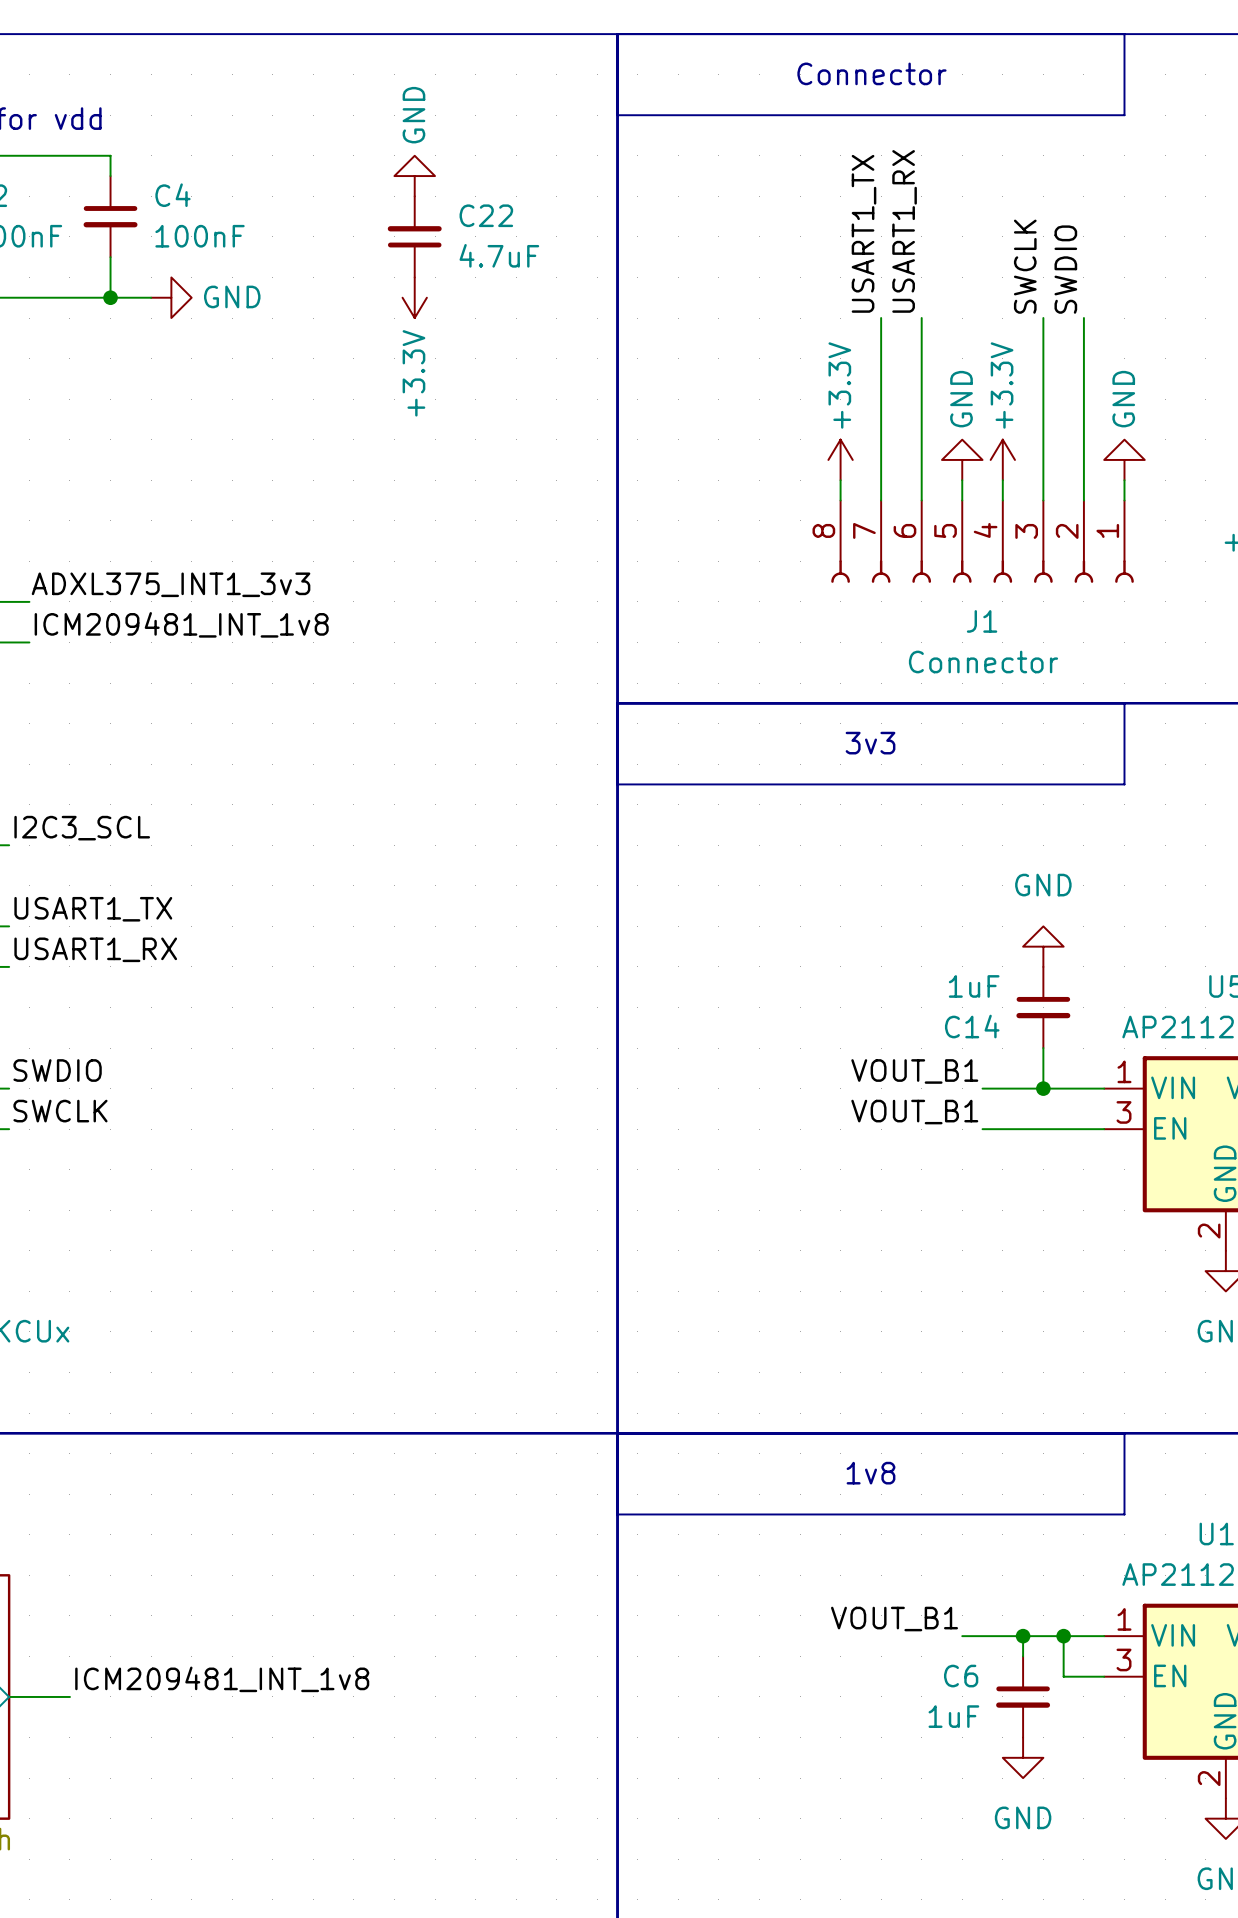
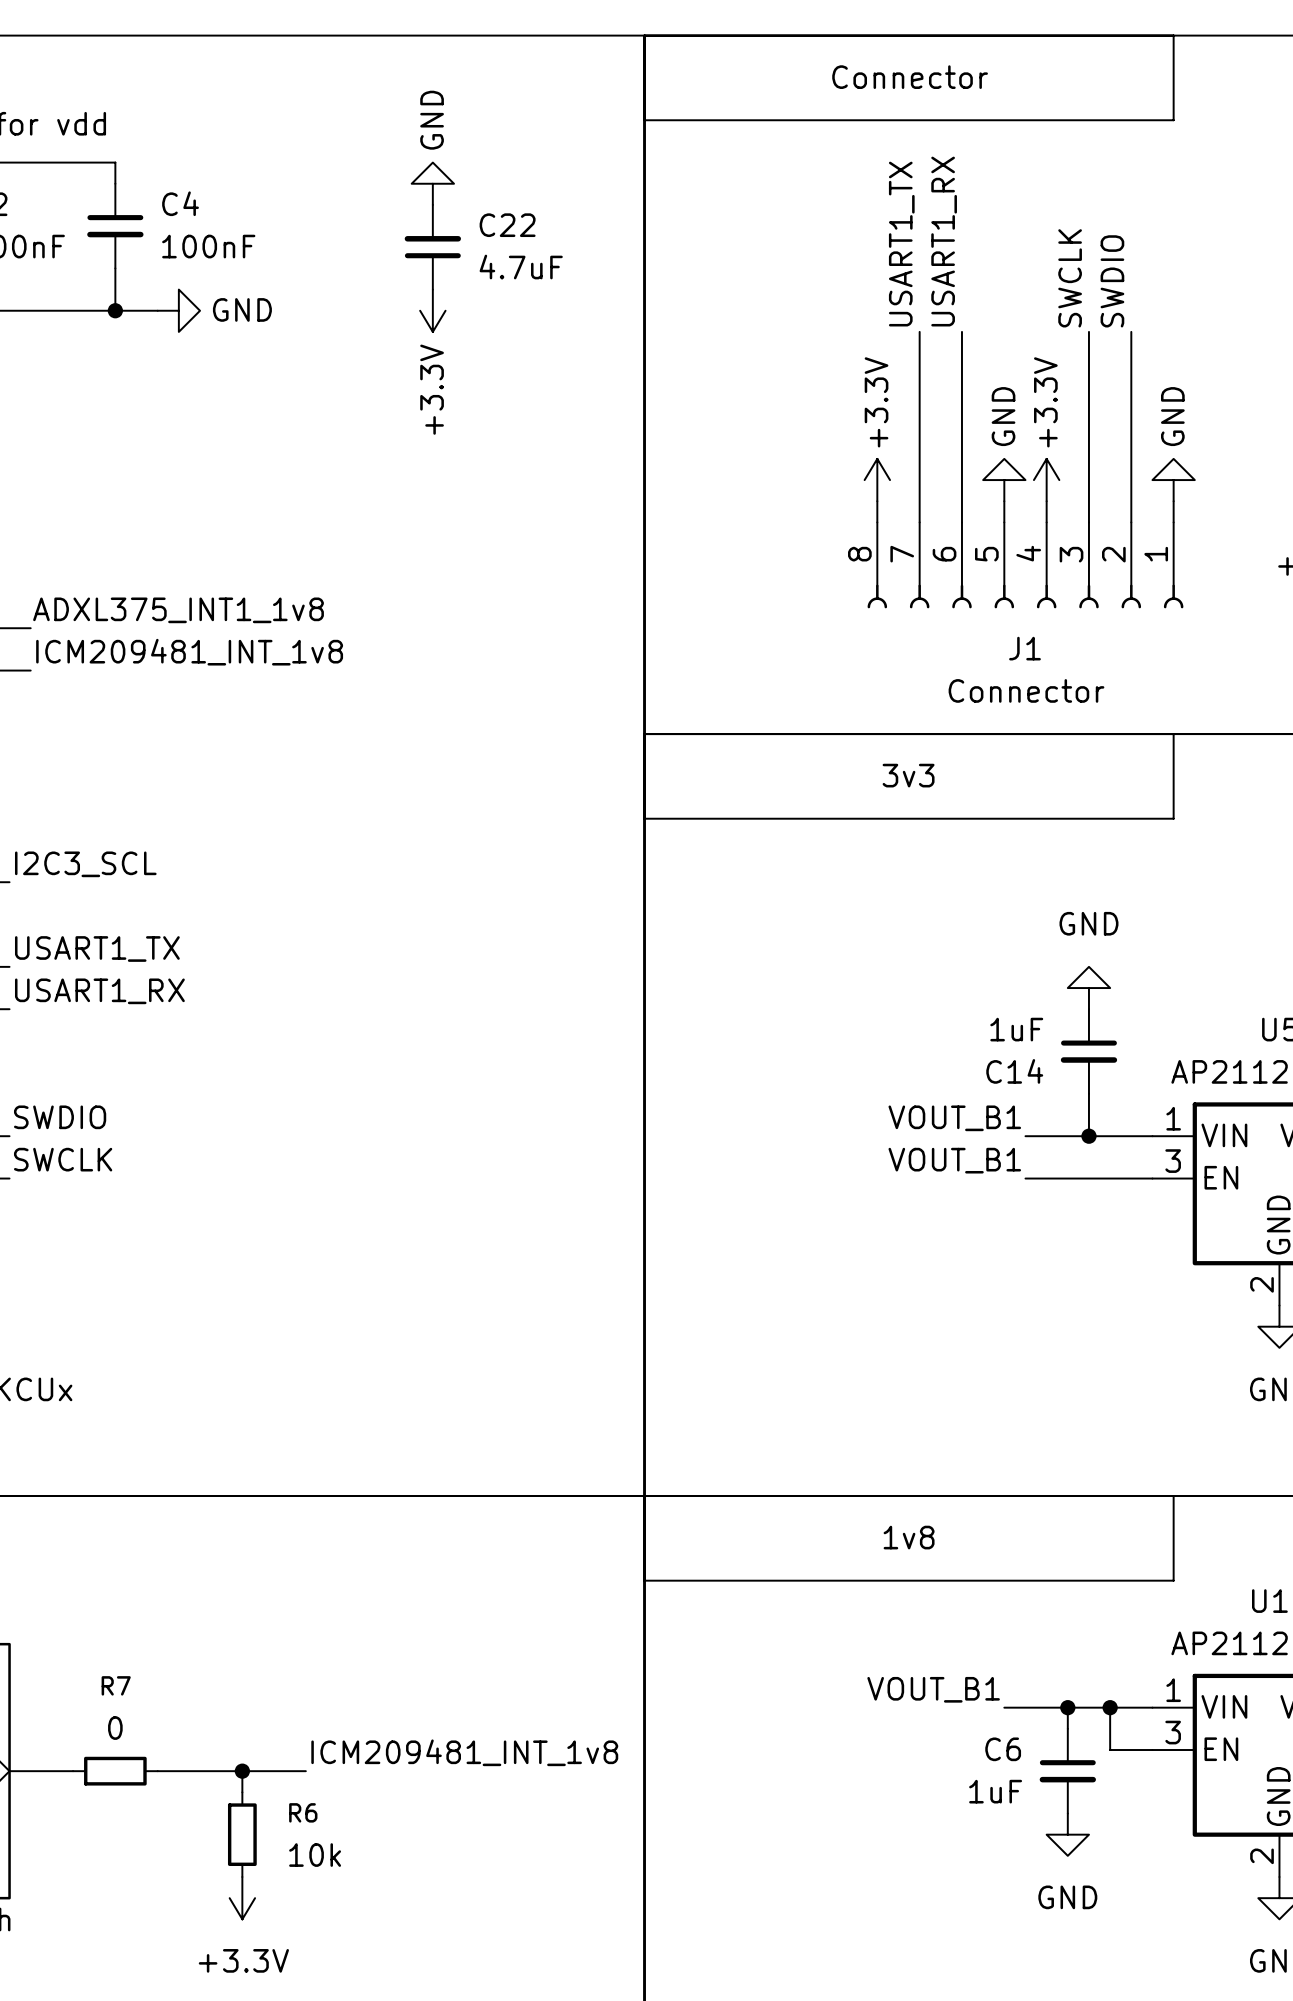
label: ADXL375_INT1_3v3 (171, 584) -> ADXL375_INT1_1v8 (178, 610)
label position: ICM209481_INT_1v8 (222, 1679) -> ICM209481_INT_1v8 (464, 1752)
R7: none -> 0 (115, 1771)
wire: none -> (157, 1771) (305, 1771)
wire: none -> (242, 1771) (242, 1792)
junction: none -> (242, 1771)
R6: none -> 10k (242, 1834)
power symbol: none -> +3.3V (242, 1898)

